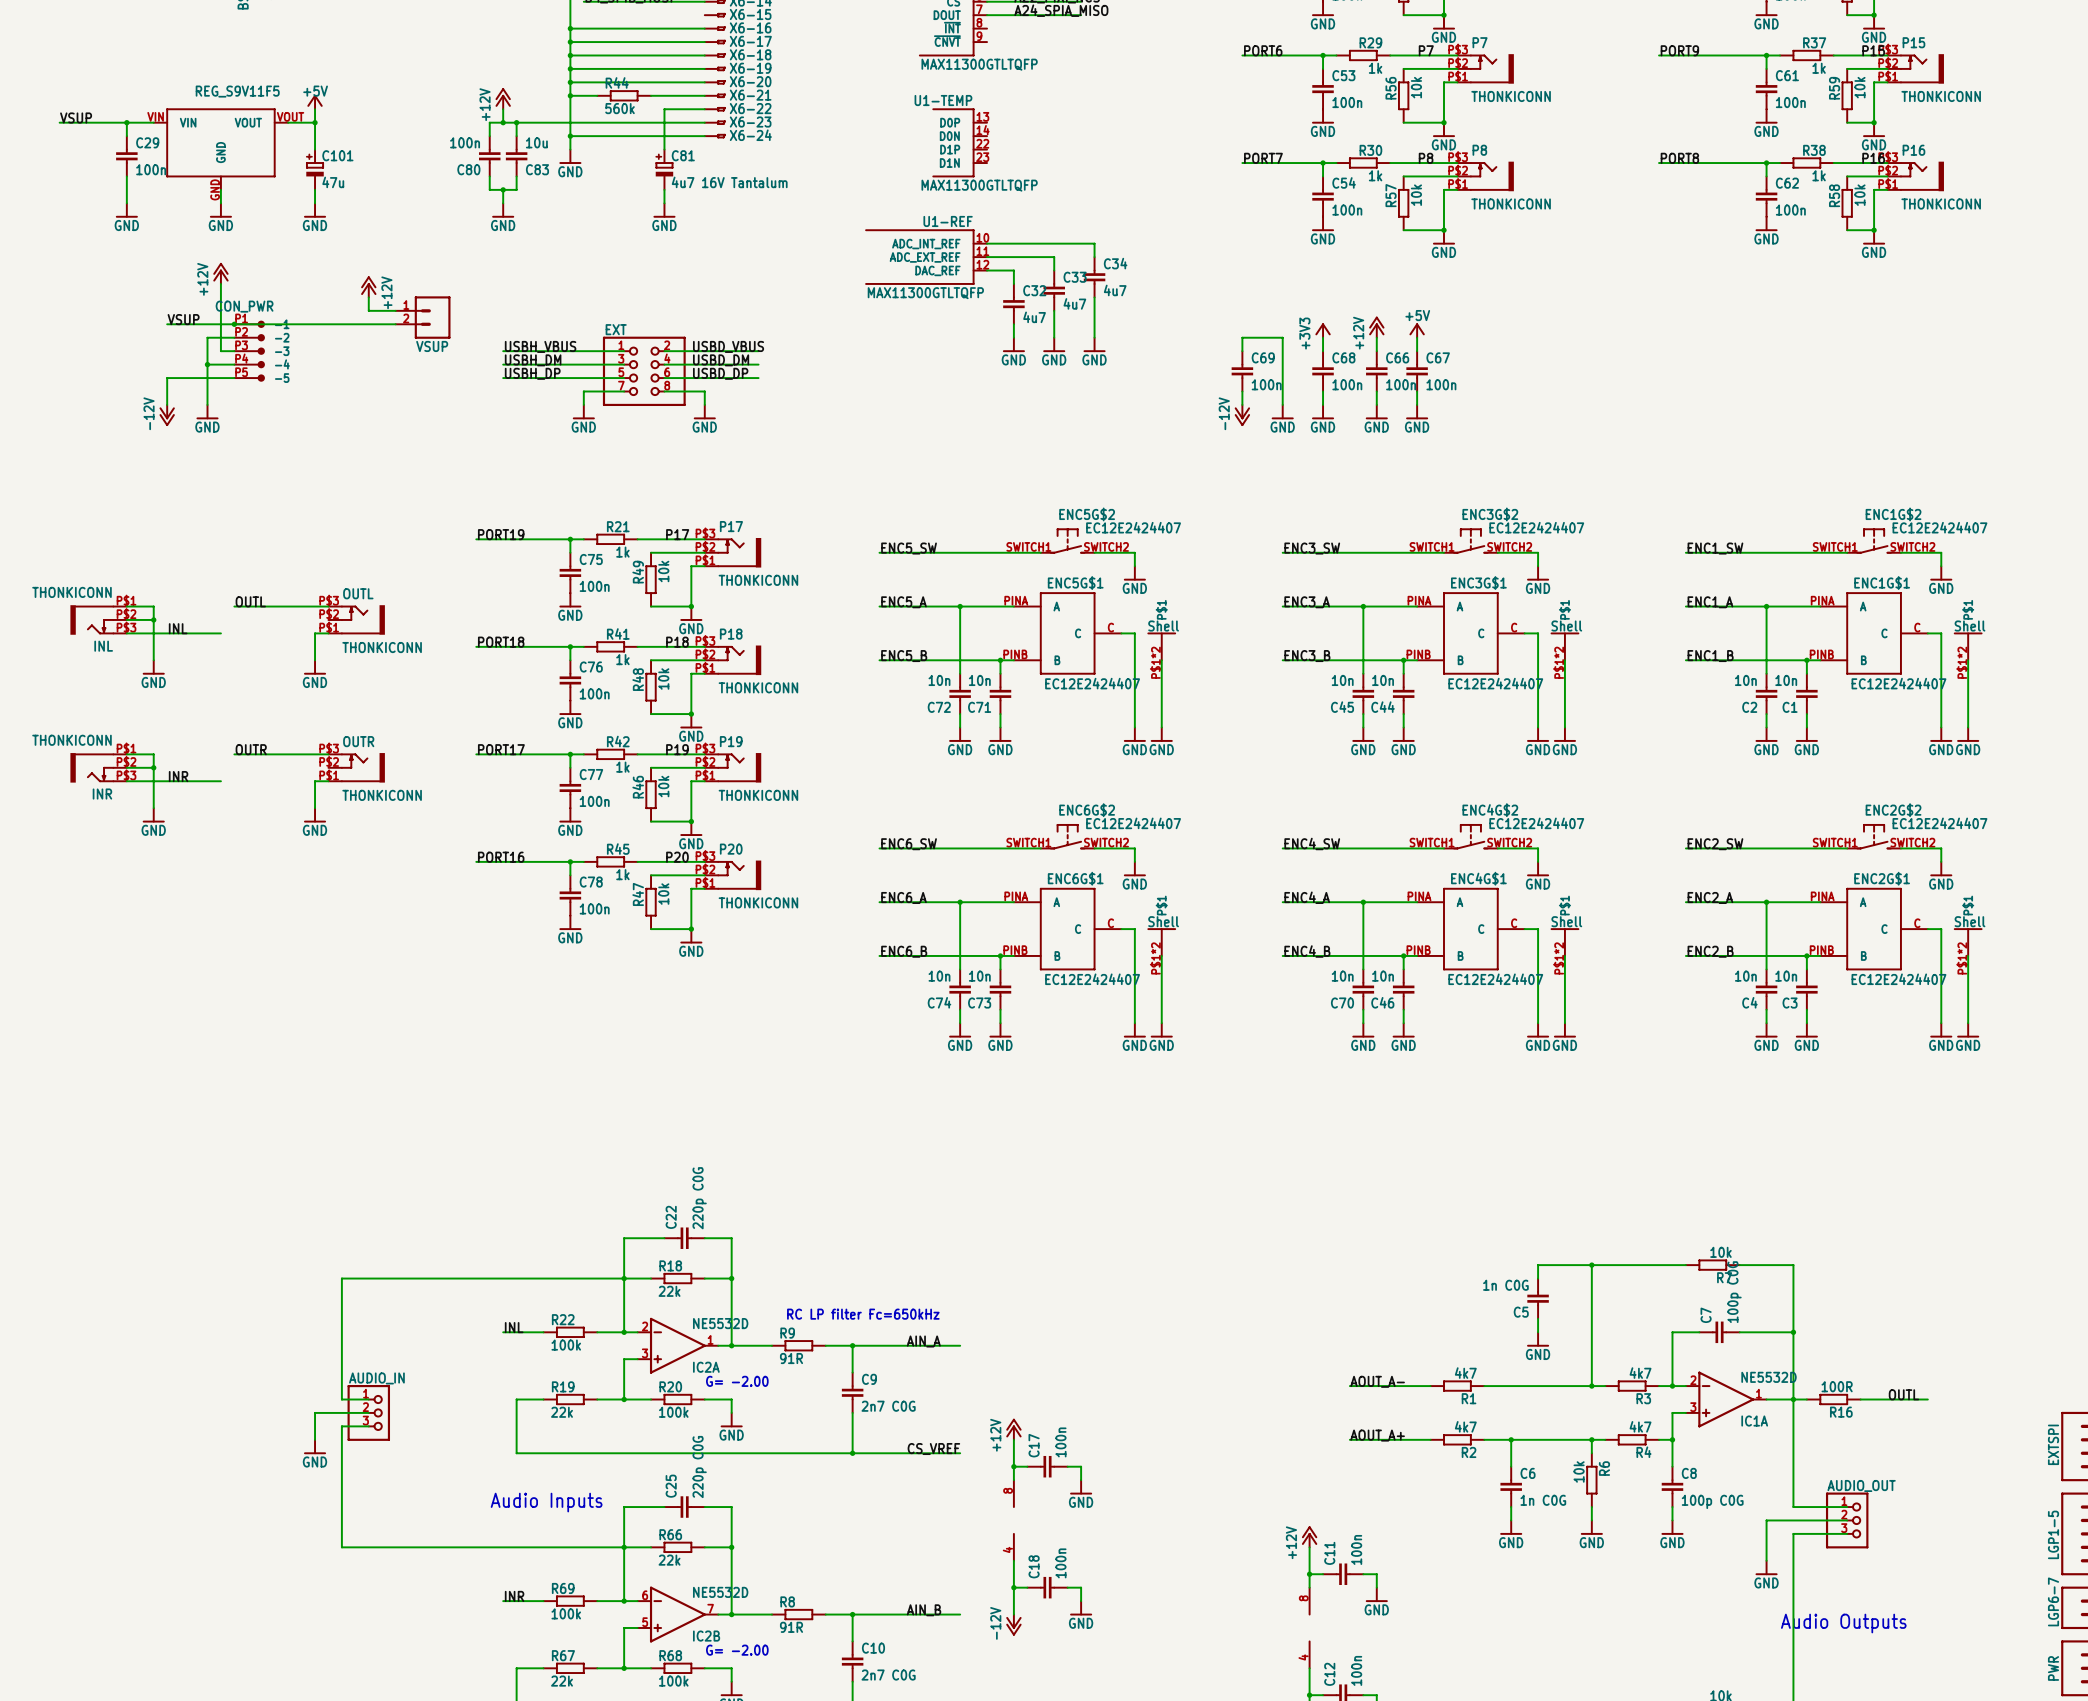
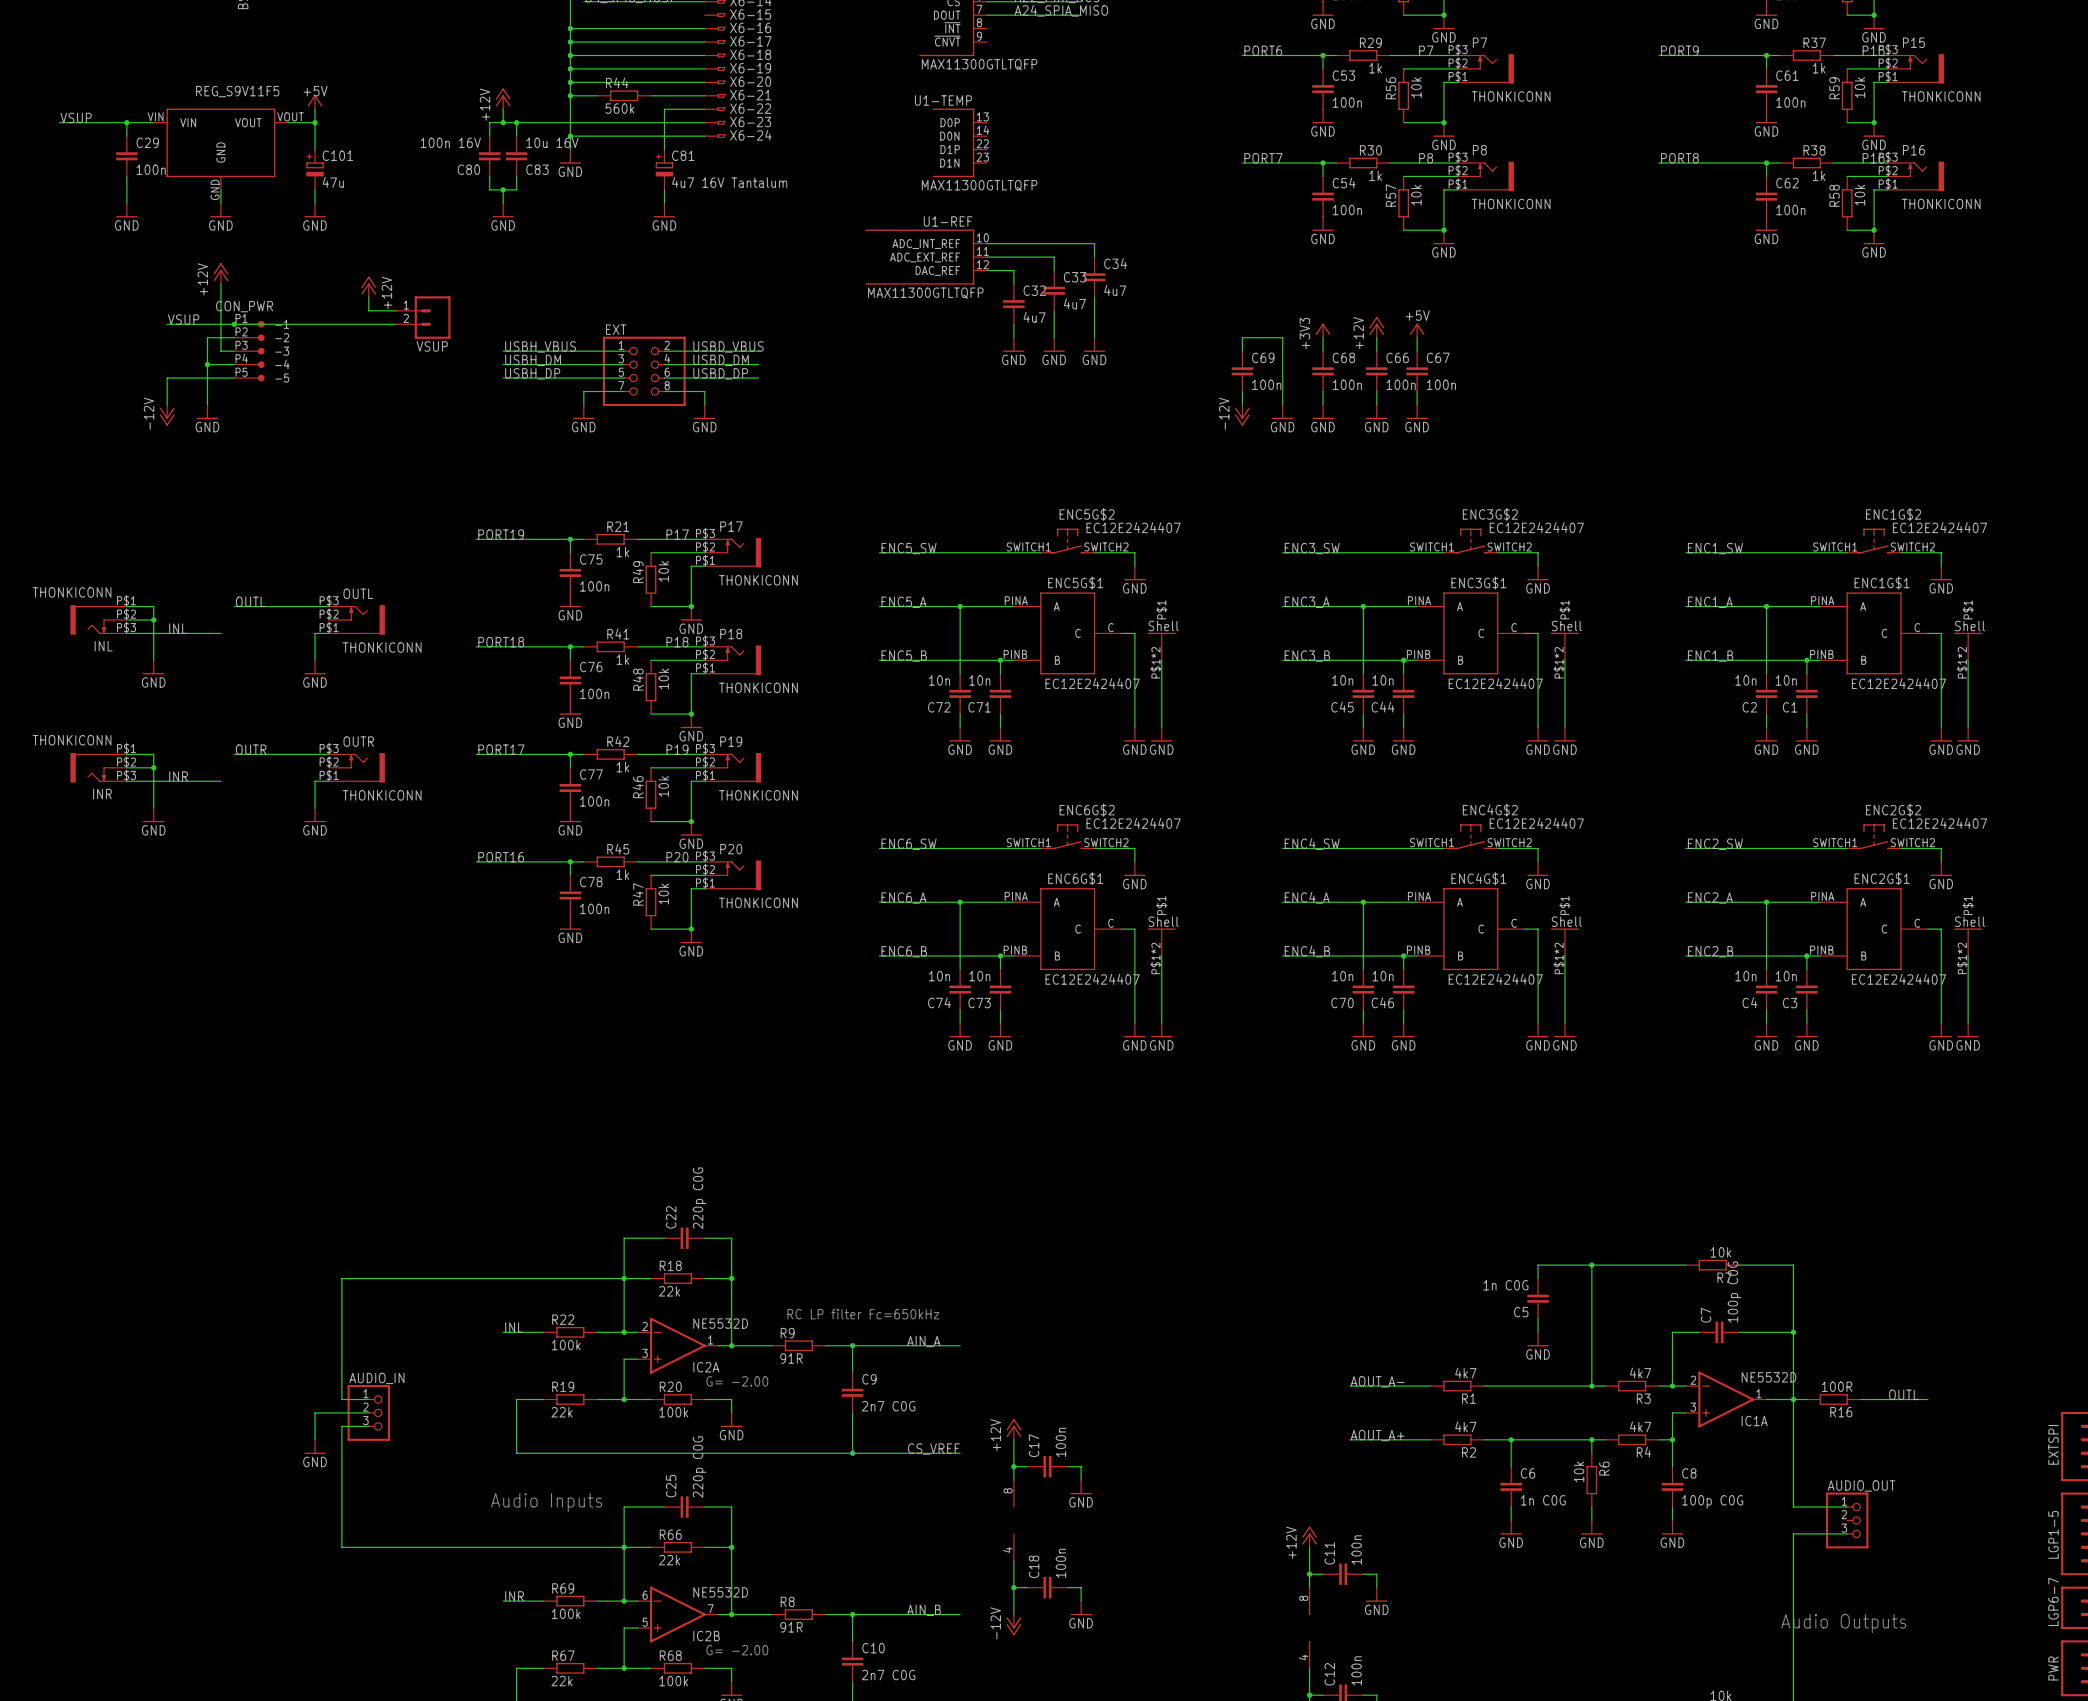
C80 value: 100n (465, 142) -> 100n 16V (450, 142)
C83 value: 10u (536, 142) -> 10u 16V (552, 142)
wire: (1847, 1520) (1766, 1520) (1766, 1560) -> none
power symbol: GND (1766, 1567) -> none

